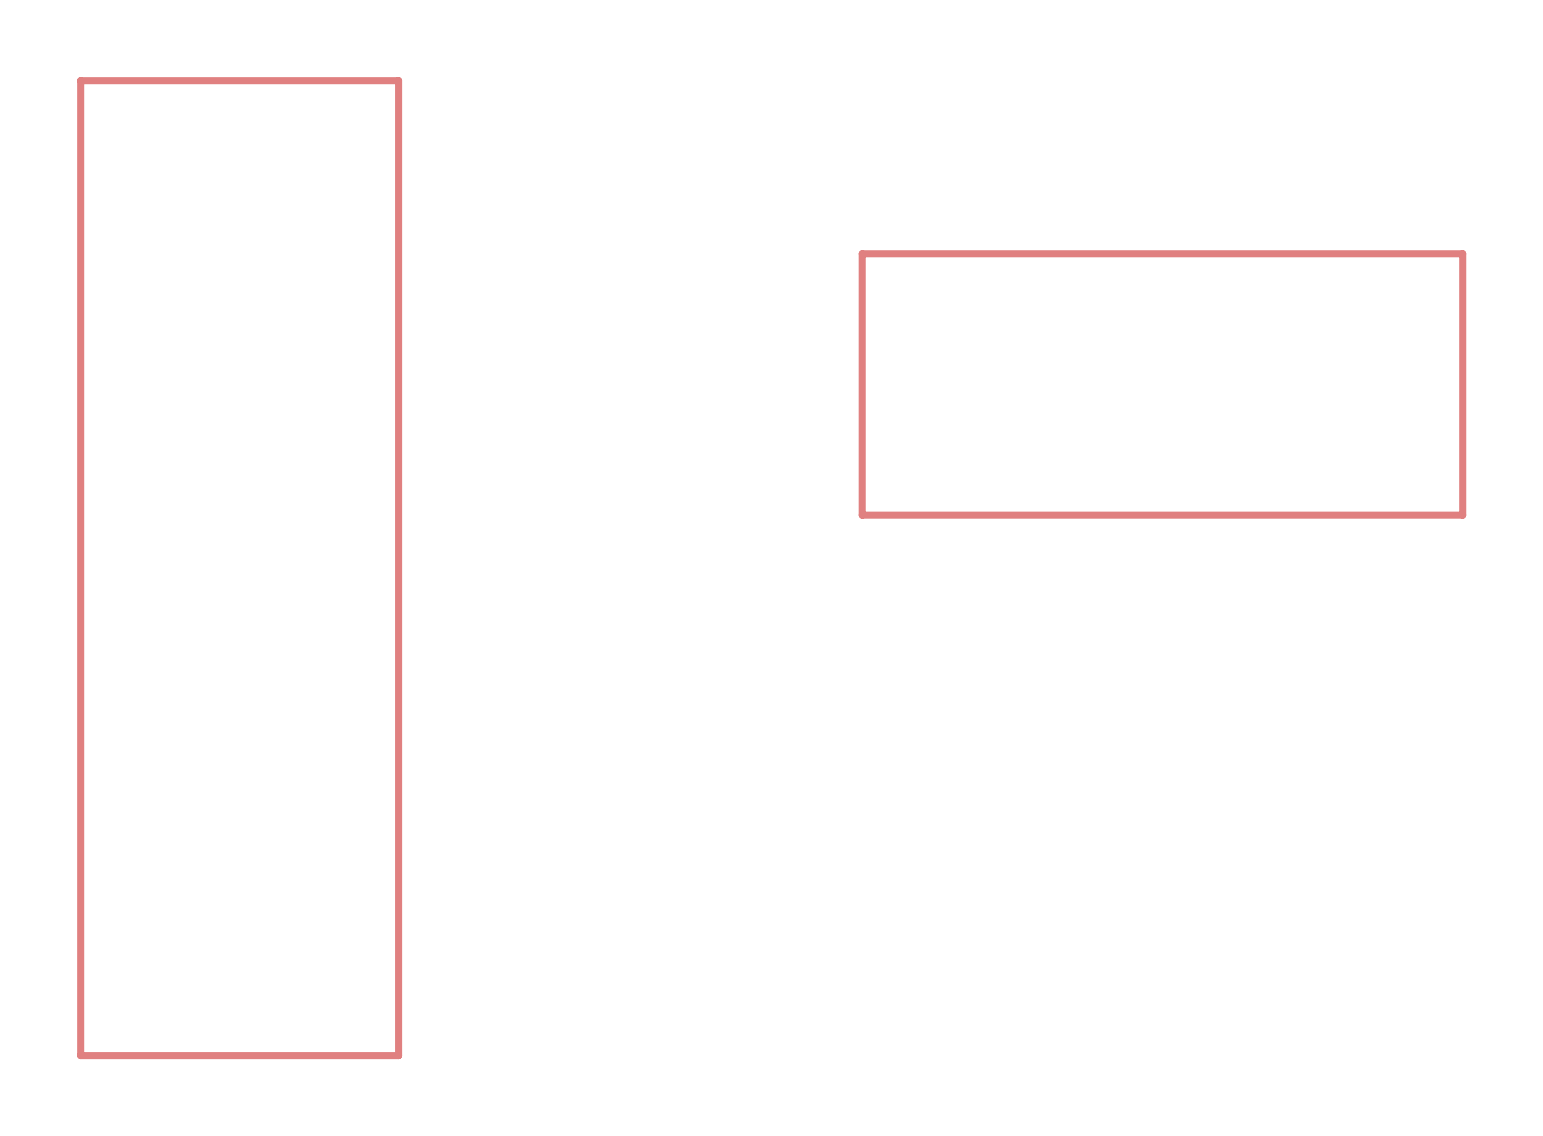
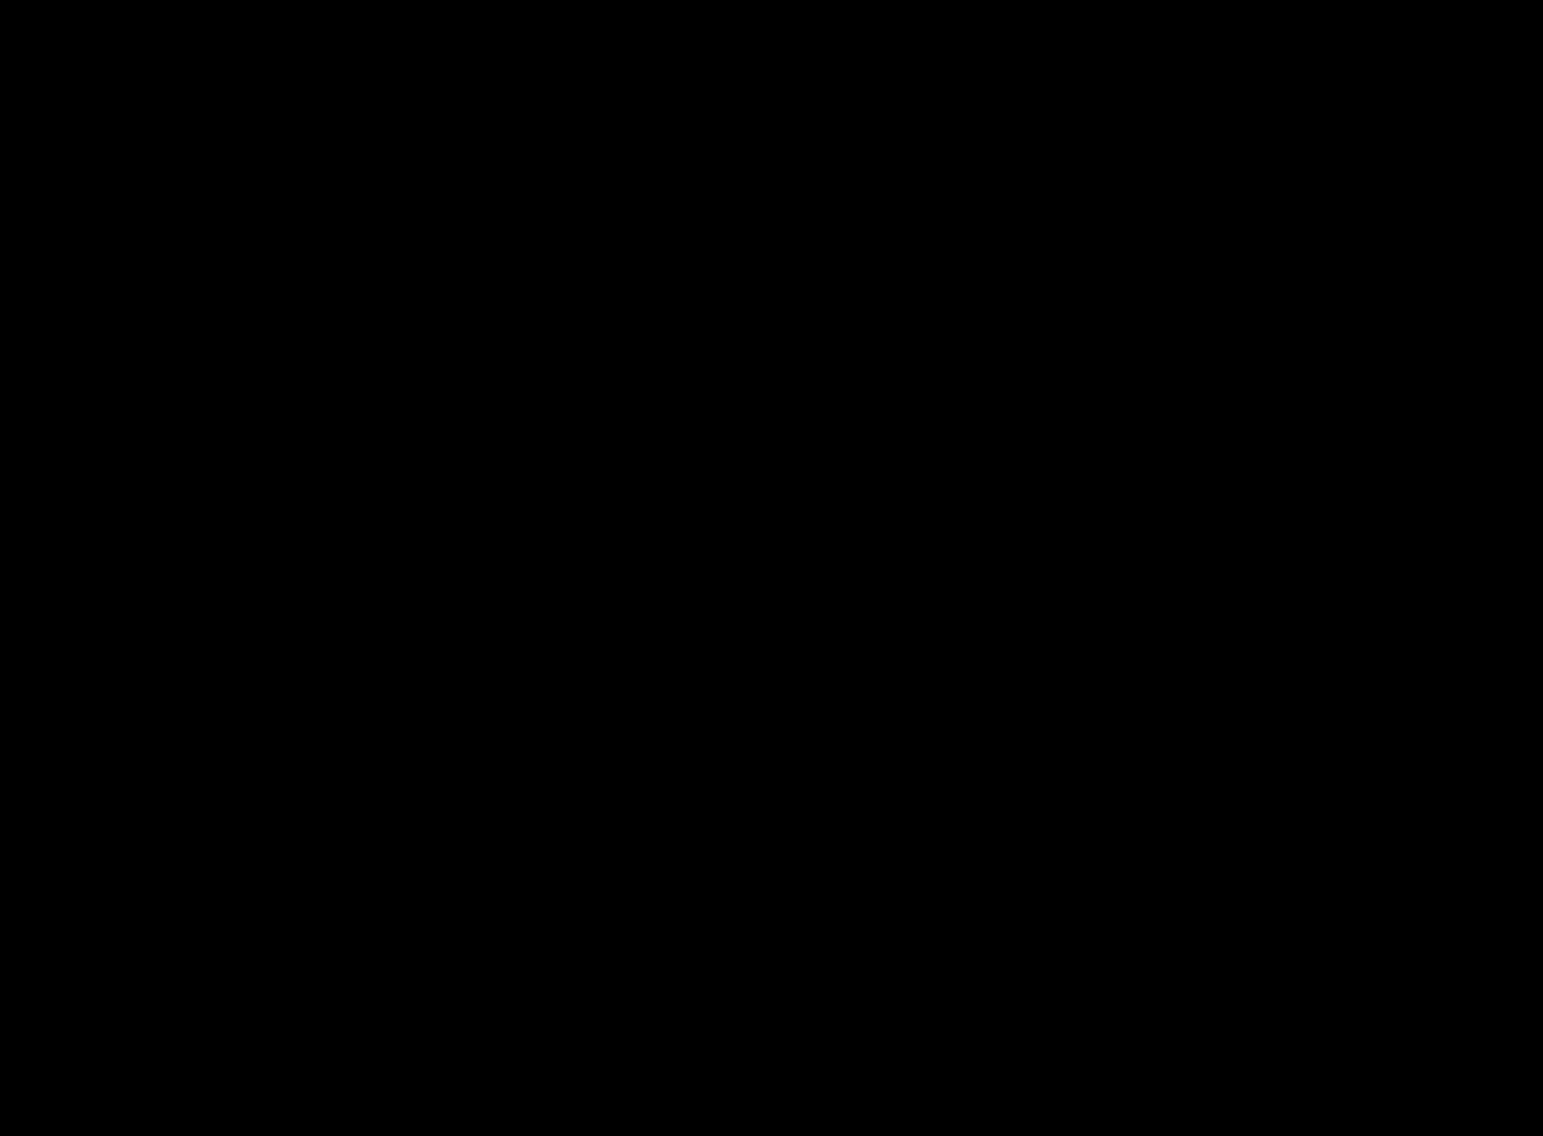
track: (80, 80) (398, 80) (398, 1055) (80, 1055) (80, 80) -> none
track: (862, 253) (1462, 253) (1462, 515) (862, 515) (862, 253) -> none

